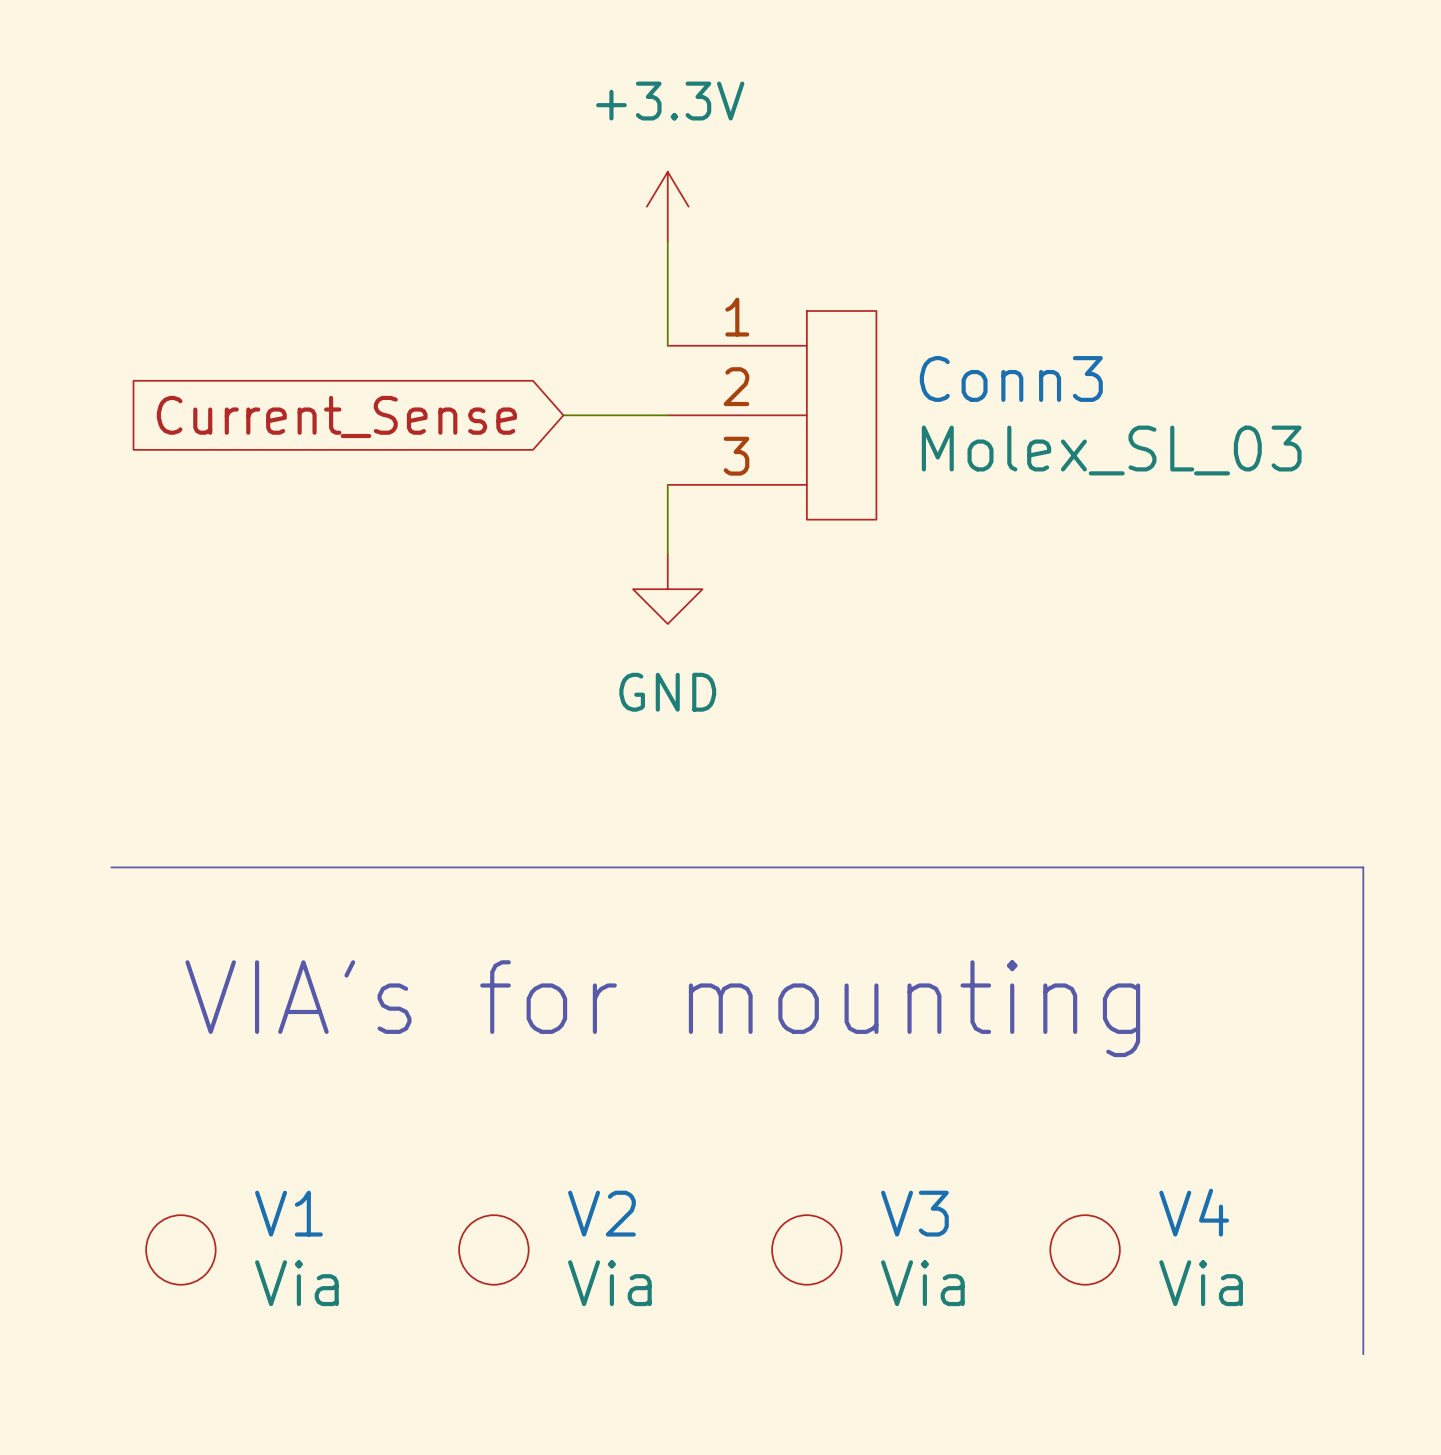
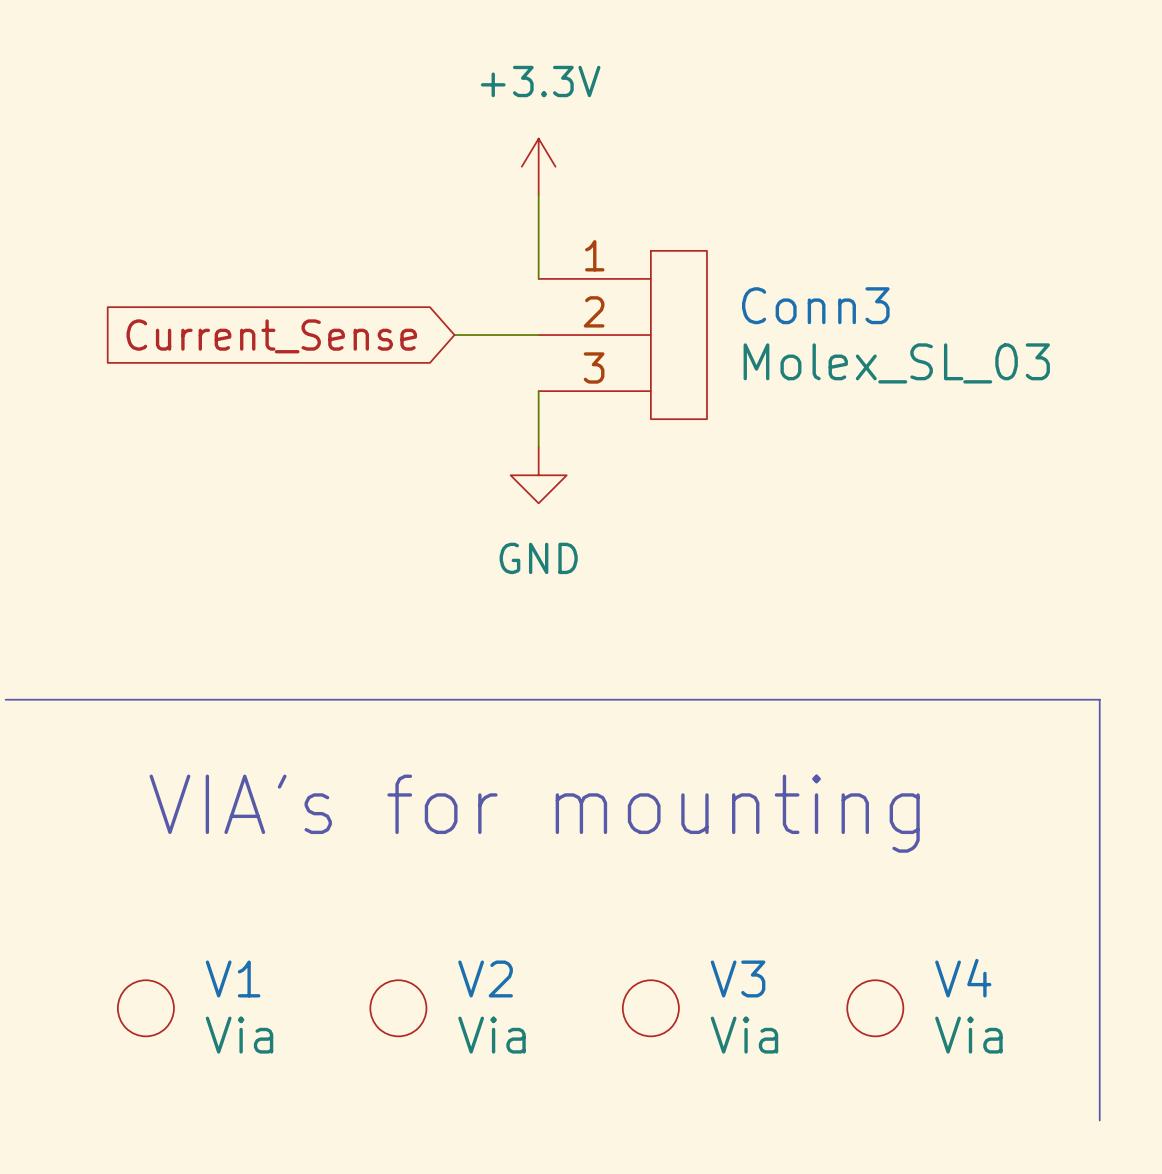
line: none -> (5, 699) (89, 699)
line: none -> (1099, 1092) (1099, 1120)

